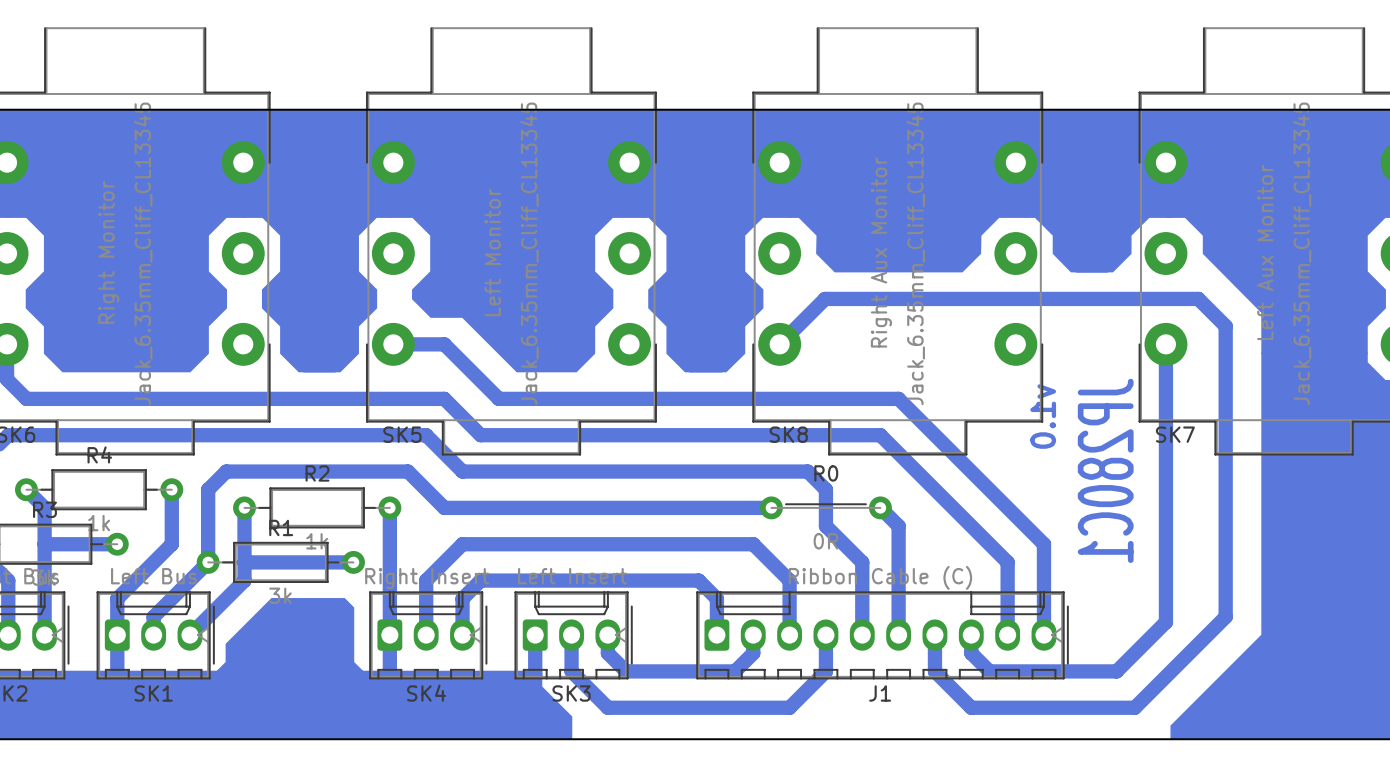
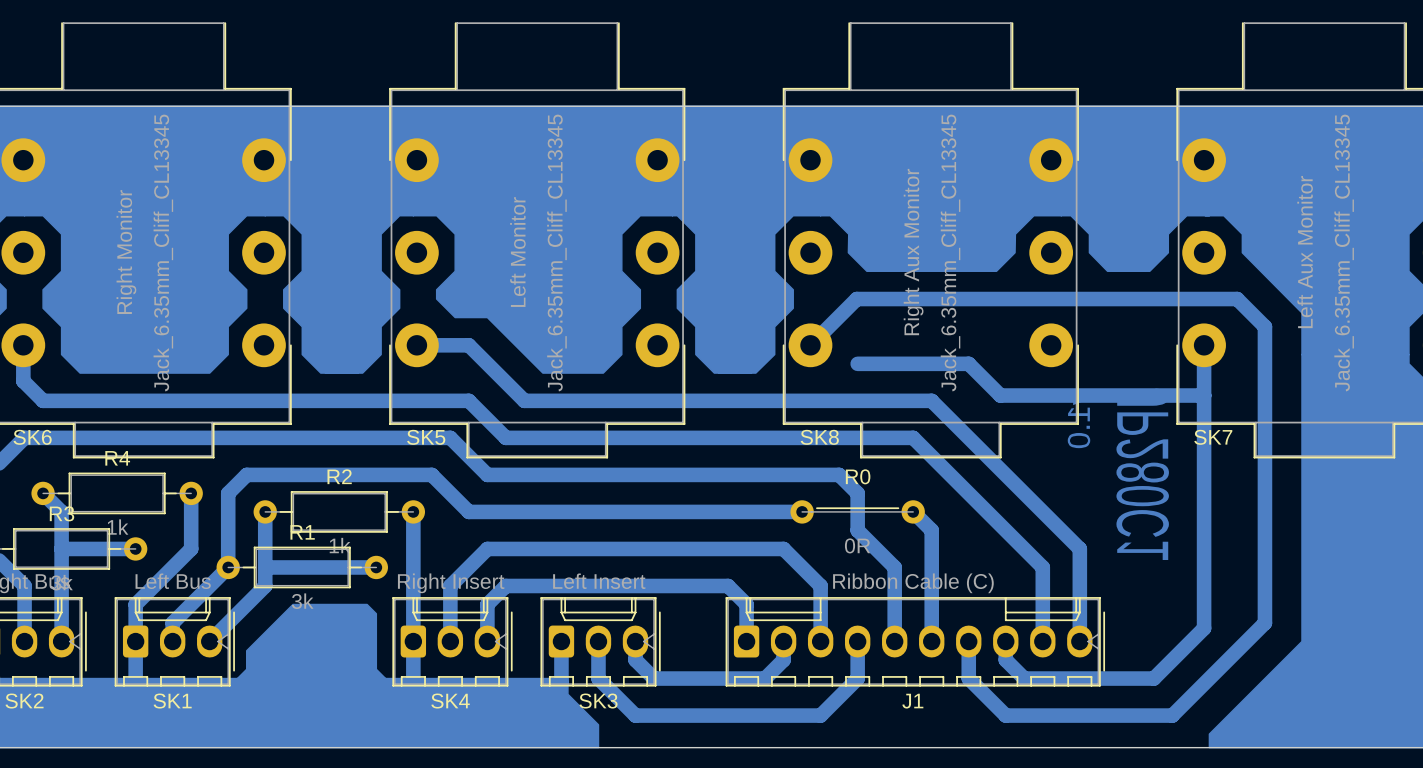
bottom track: none -> (857, 363) (968, 363) (1000, 395) (1204, 395)

